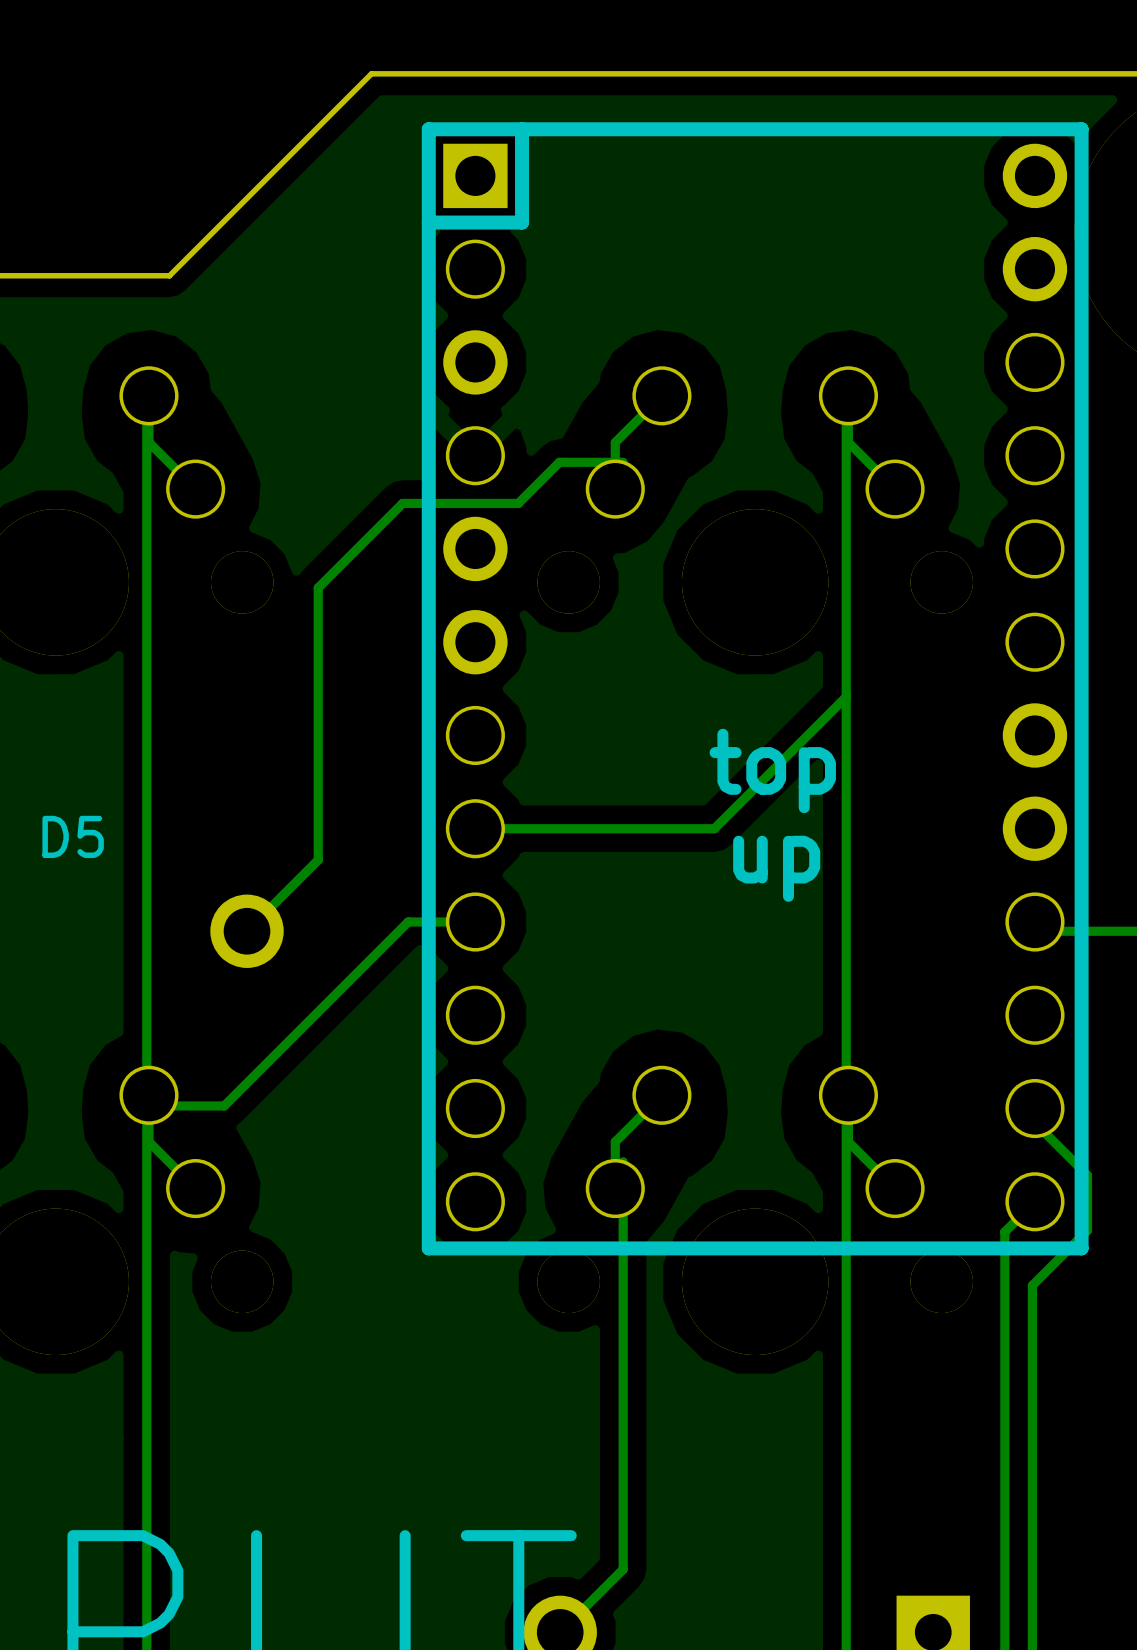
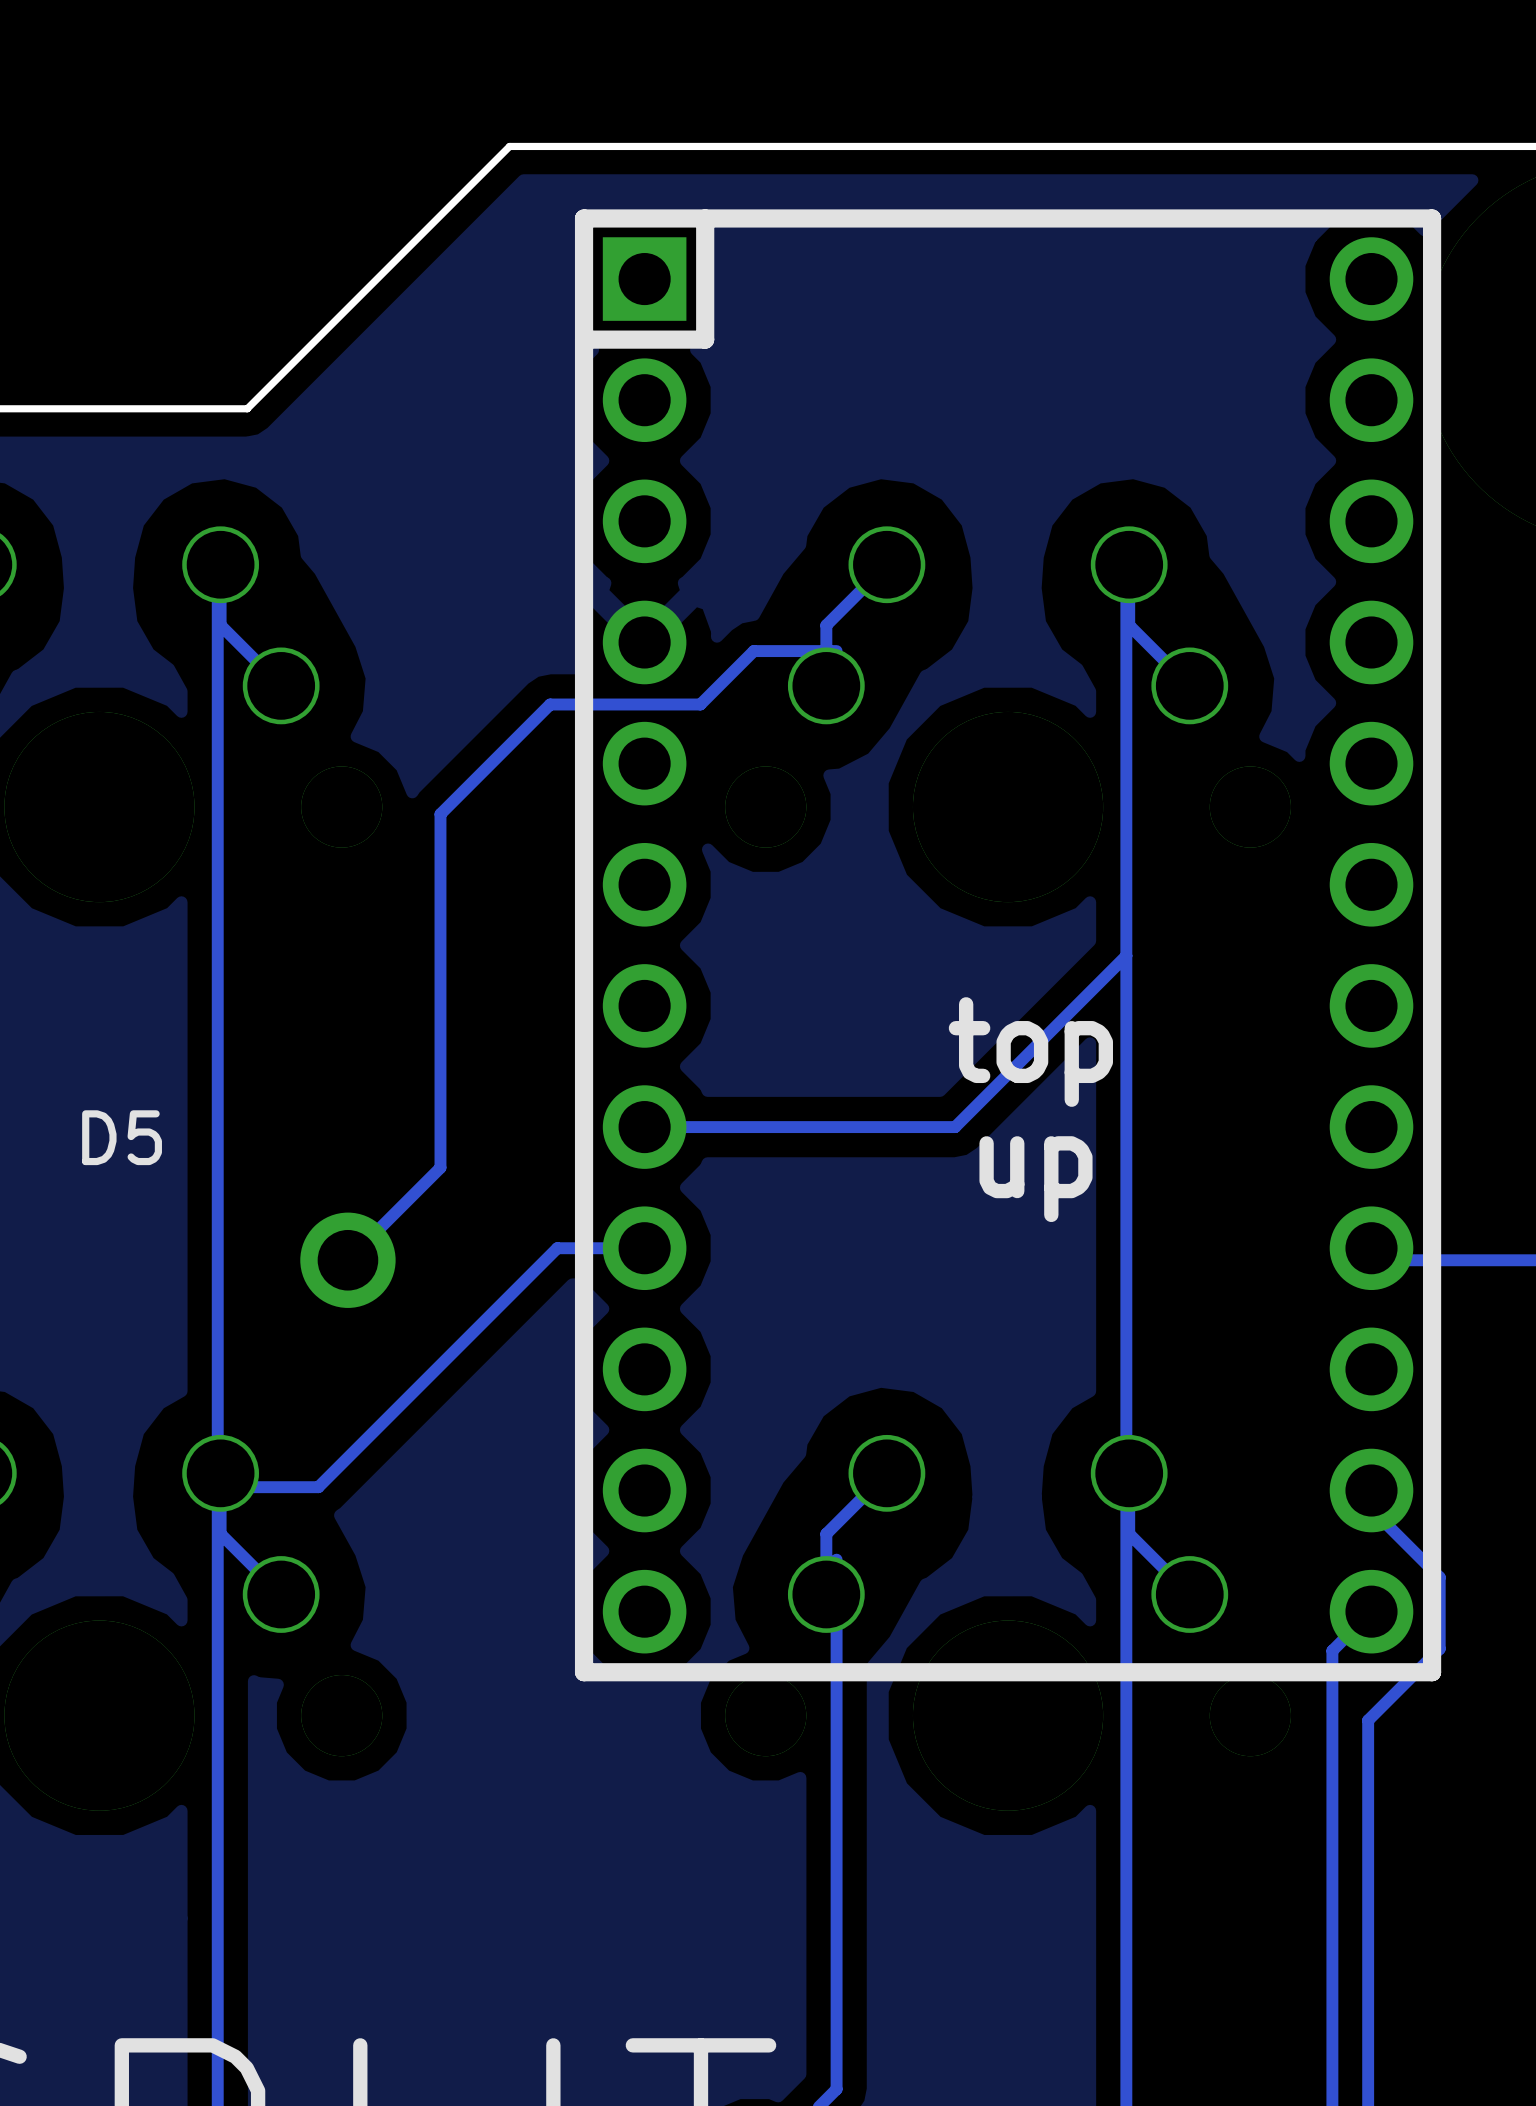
part footprint: [421, 122, 1089, 1256] -> [574, 209, 1442, 1682]

